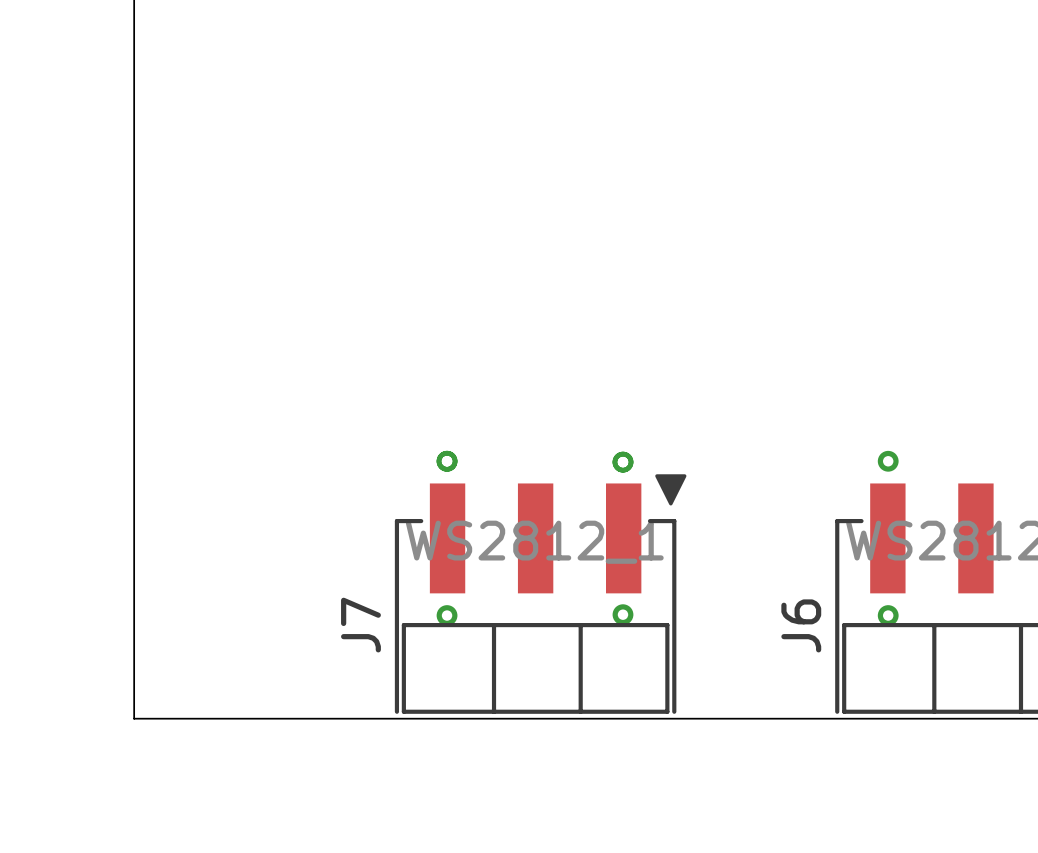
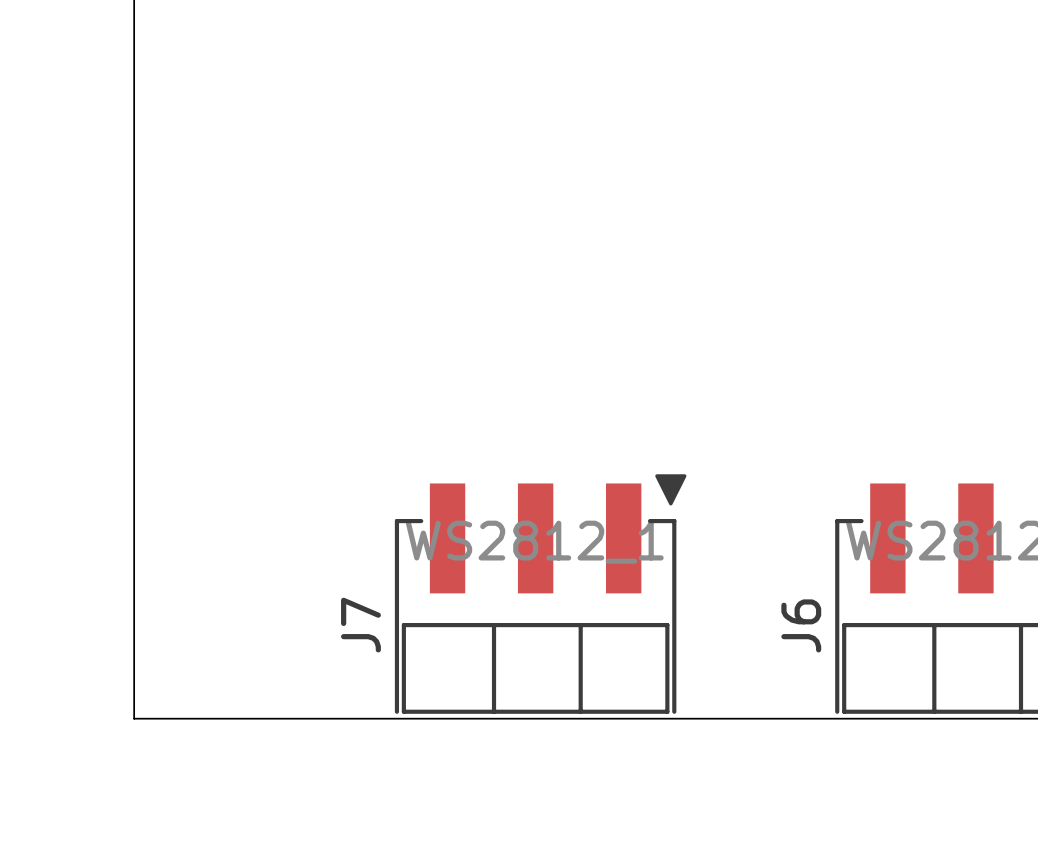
part: (447, 461) -> none
part: (888, 461) -> none
part: (622, 462) -> none
part: (622, 614) -> none
part: (447, 615) -> none
part: (888, 615) -> none

